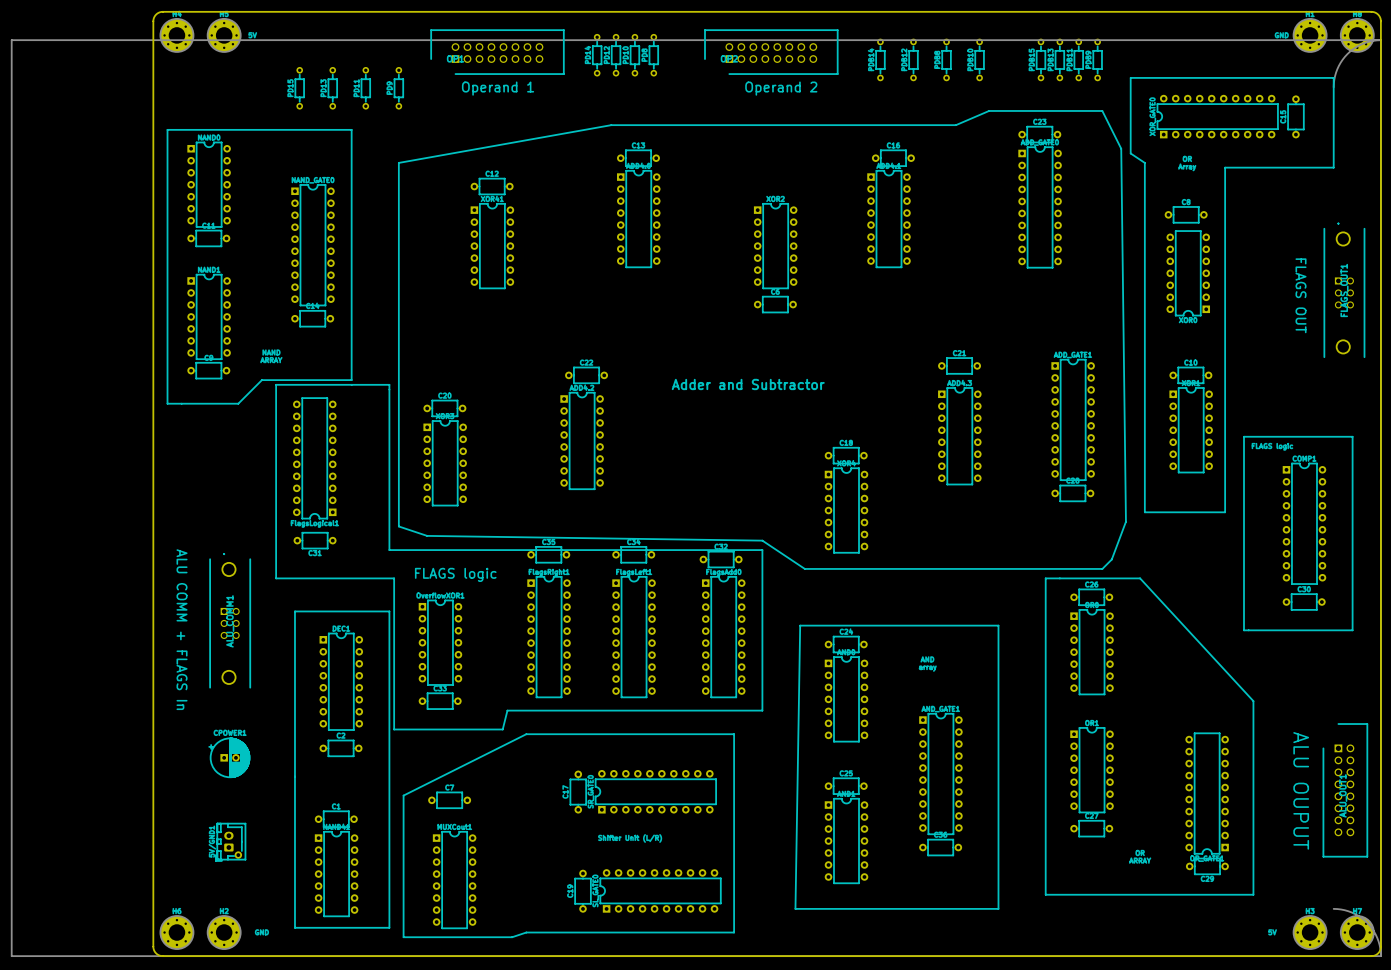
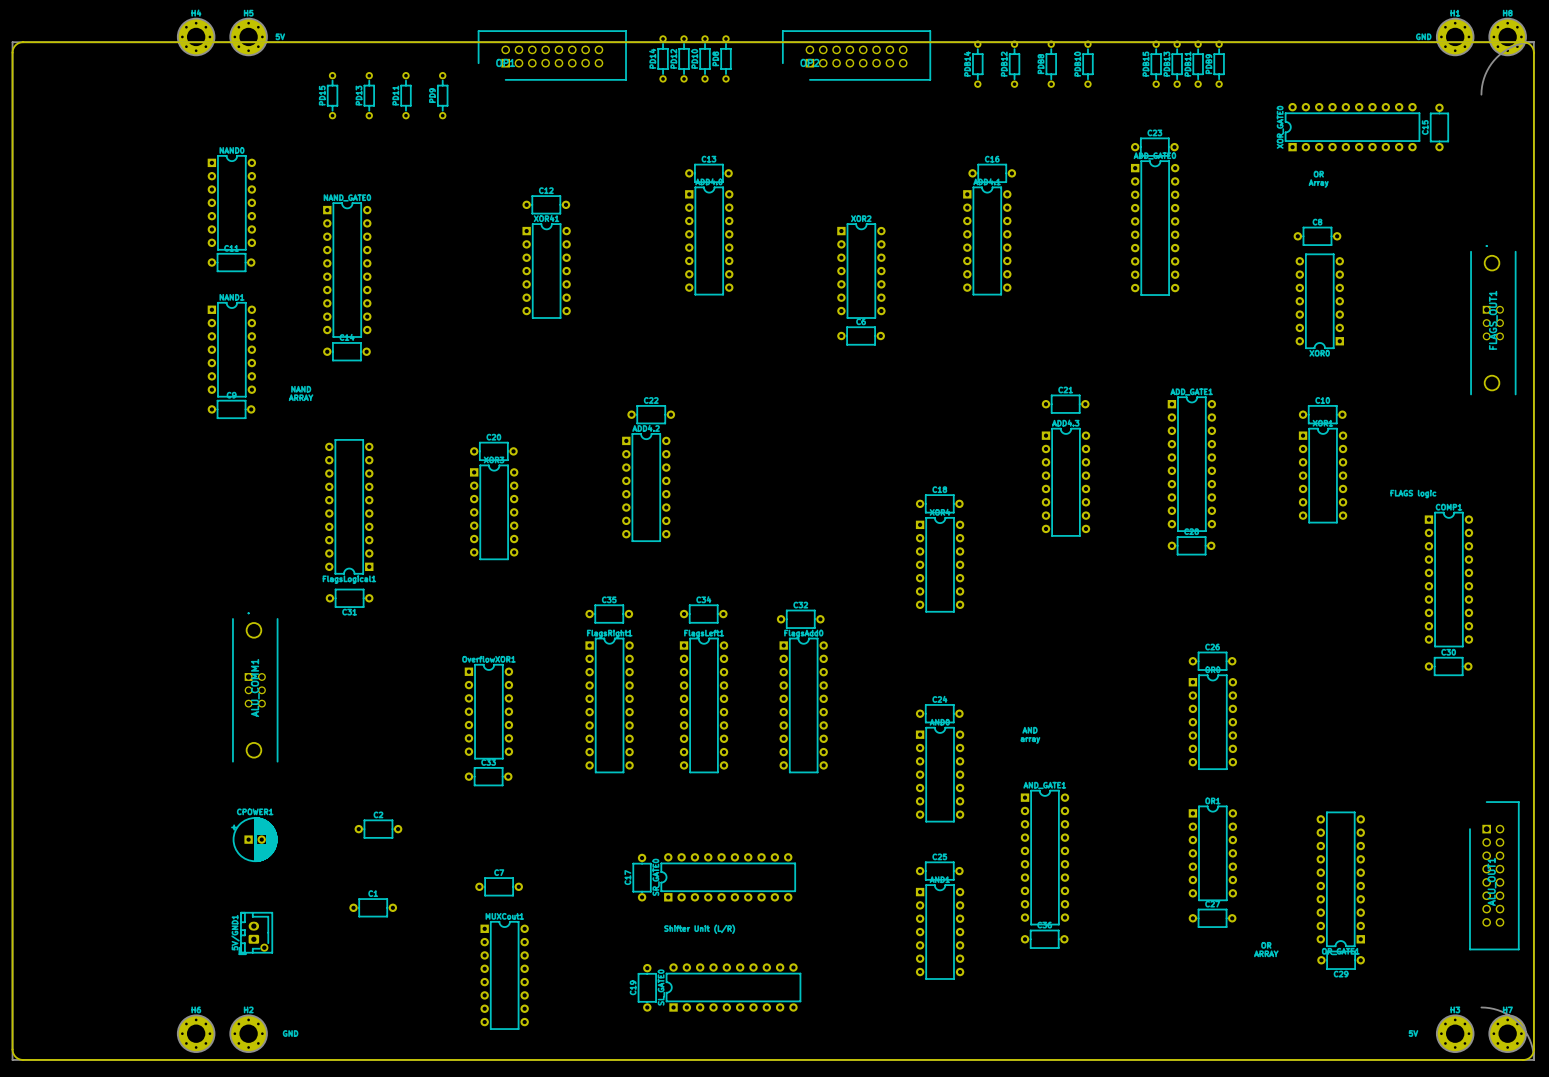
board edge: (1380, 49) (1380, 18) (1377, 13) (1371, 11) (162, 11) (157, 13) (153, 21) (153, 946) (156, 953) (162, 956) -> (1533, 52) (1530, 45) (1523, 42) (23, 42) (16, 44) (12, 52) (12, 1050) (15, 1056) (23, 1059) (180, 1059)
line: (1130, 77) (1130, 153) (1144, 162) (1144, 512) (1225, 512) (1225, 167) (1333, 167) (1333, 77) (1130, 77) -> none
text: Operand 1 (498, 88) -> none
text: Operand 2 (781, 88) -> none
line: (989, 110) (1102, 110) (1121, 148) (1125, 521) (1111, 559) (1102, 568) (804, 568) (762, 540) (427, 535) (398, 526) (398, 162) (611, 125) (955, 125) (989, 110) -> none
line: (167, 129) (167, 403) (238, 403) (261, 380) (351, 380) (351, 129) (167, 129) -> none
text: FLAGS OUT (1301, 295) -> none
line: (276, 384) (389, 384) (389, 550) (762, 550) (762, 710) (507, 710) (502, 729) (394, 729) (394, 578) (276, 578) (276, 384) -> none
text: Adder and Subtractor (748, 384) -> none
line: (1244, 436) (1244, 630) (1352, 630) (1352, 436) (1244, 436) -> none
text: FLAGS logic (455, 574) -> none
line: (1045, 578) (1140, 578) (1253, 701) (1253, 894) (1045, 894) (1045, 578) -> none
line: (294, 611) (294, 927) (389, 927) (389, 611) (294, 611) -> none
line: (800, 625) (998, 625) (998, 908) (795, 908) (800, 625) -> none
text: ALU COMM + FLAGS In (182, 629) -> none
part: (341, 681) -> none
line: (526, 734) (403, 795) (403, 937) (512, 937) (526, 932) (734, 932) (734, 734) (526, 734) -> none
text: ALU OUPUT (1301, 790) -> none
part: (336, 874) -> none

